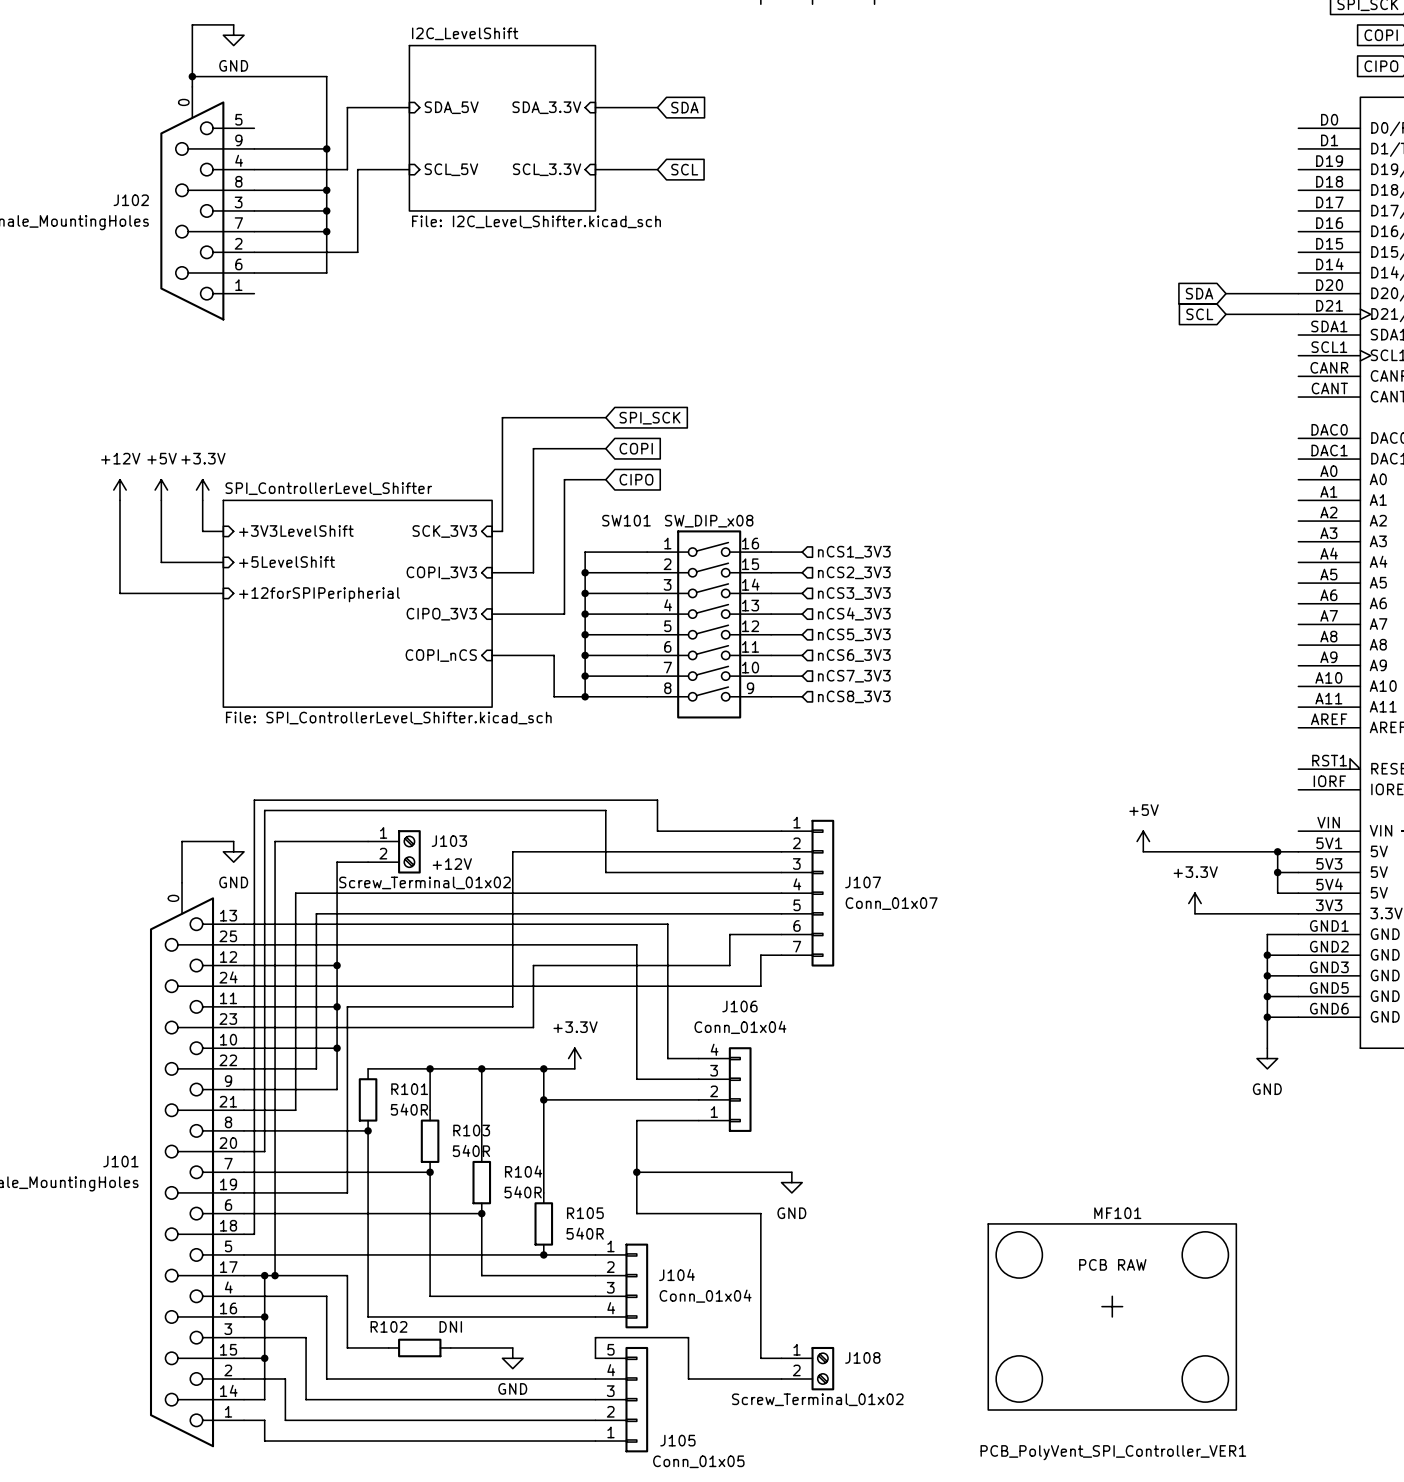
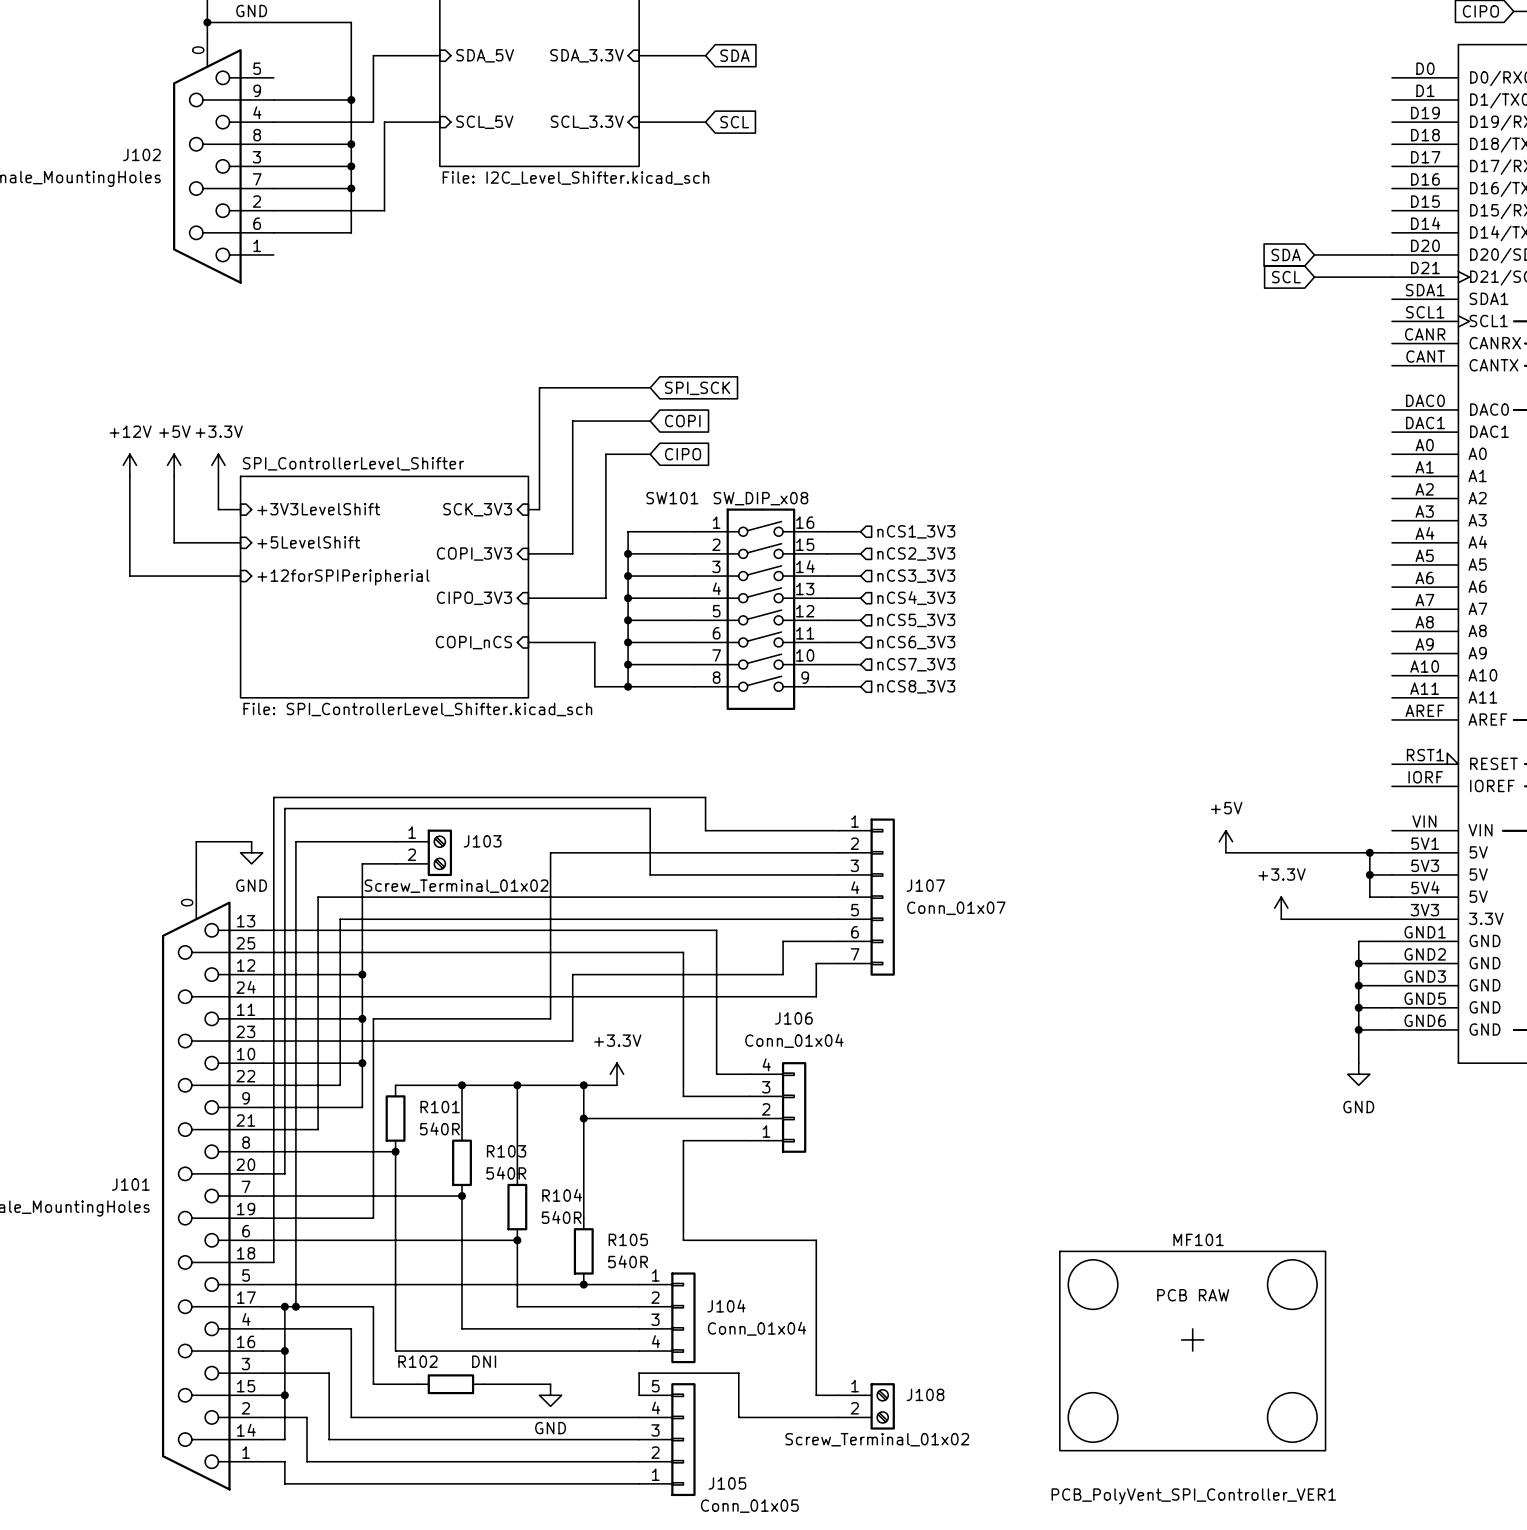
text: +12V (452, 864) -> none
wire: (636, 1172) (791, 1172) -> none
junction: (636, 1172) -> none
power symbol: GND (791, 1182) -> none

